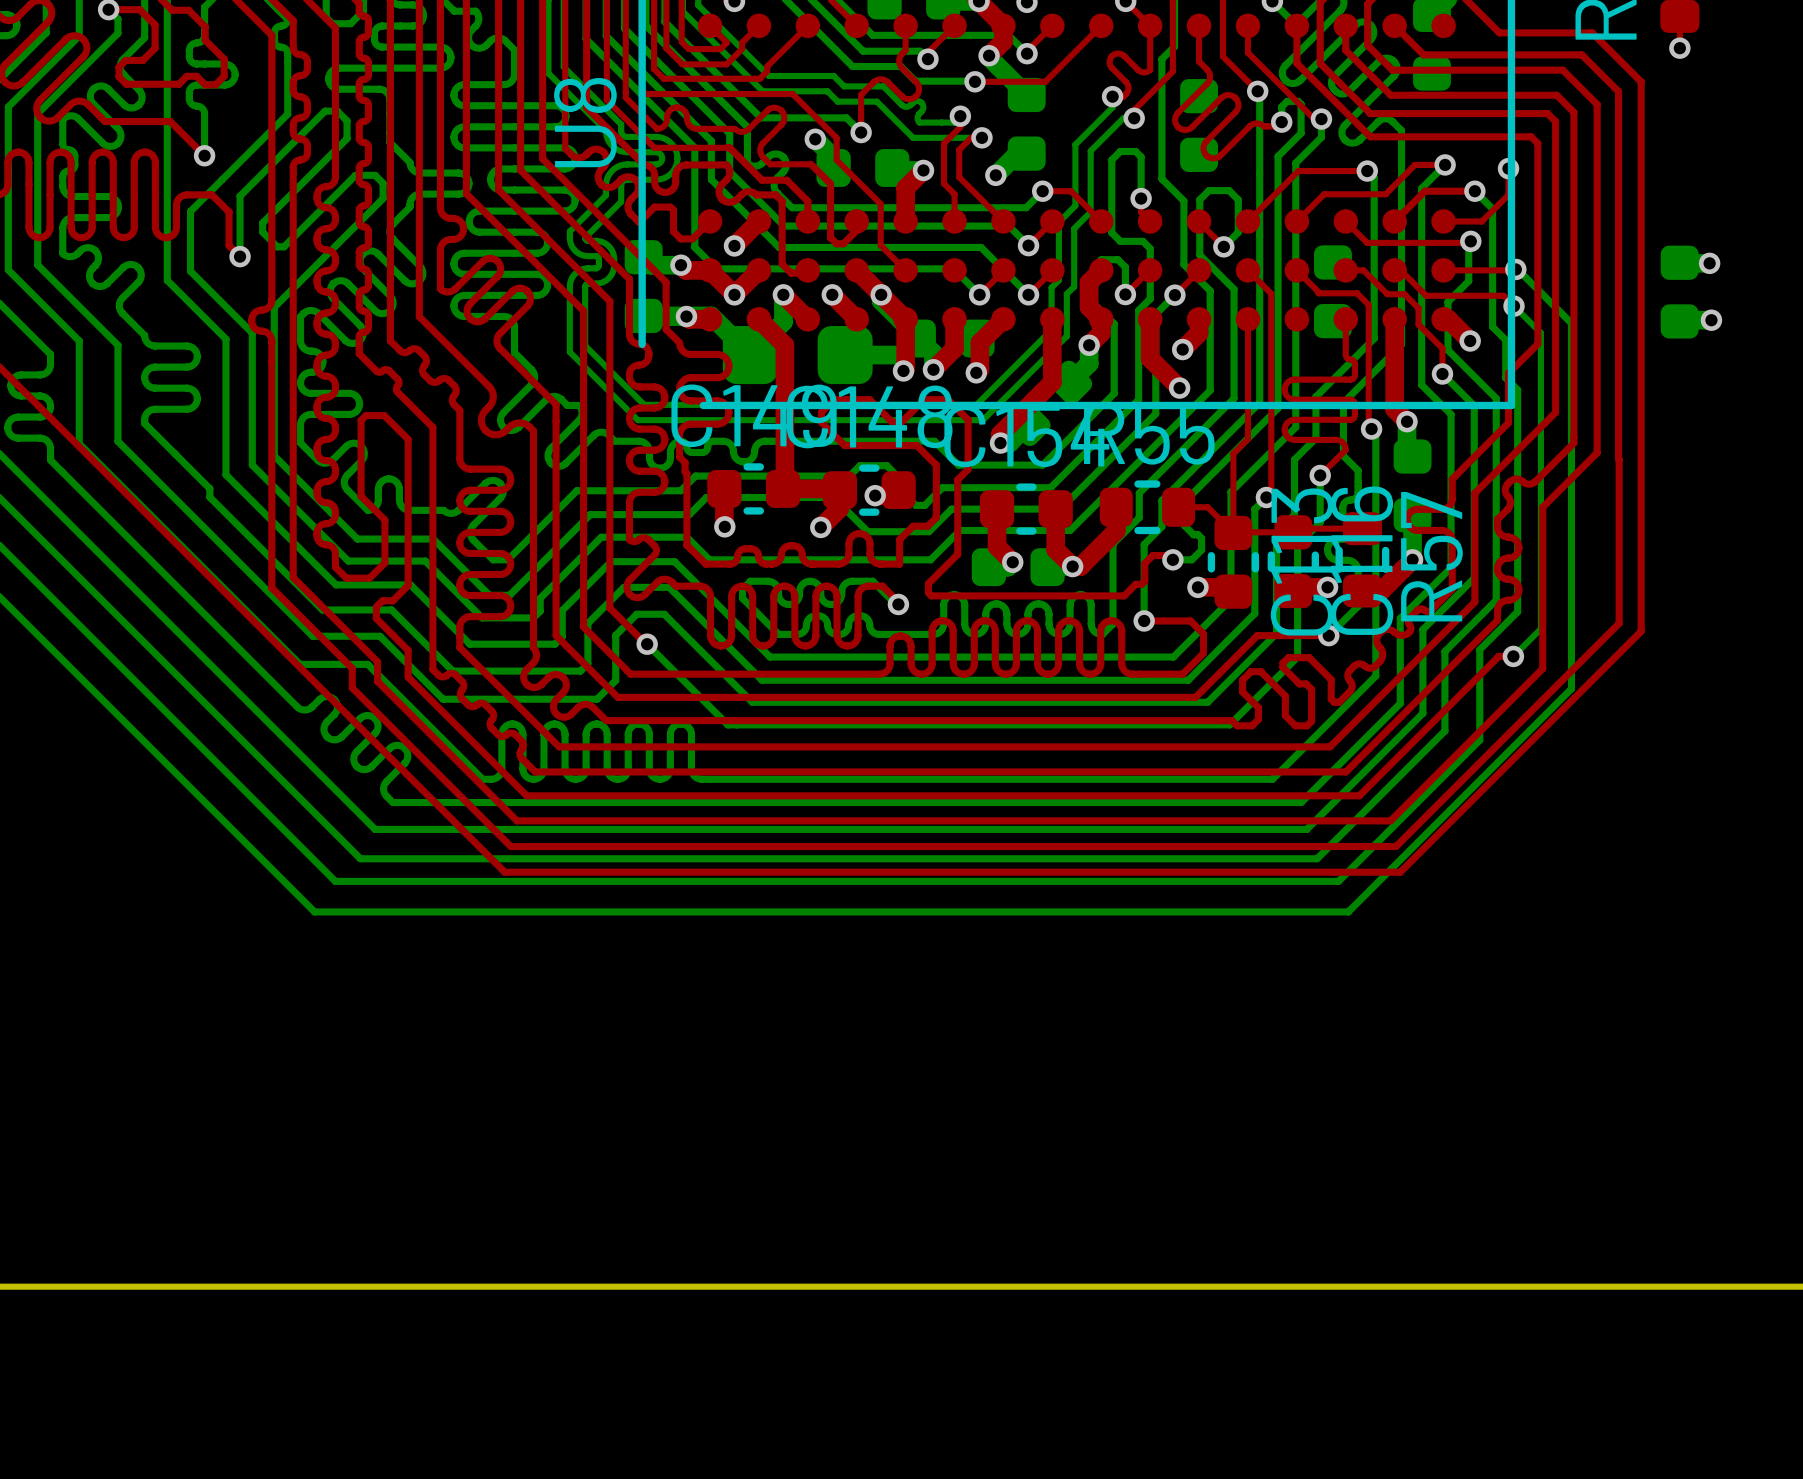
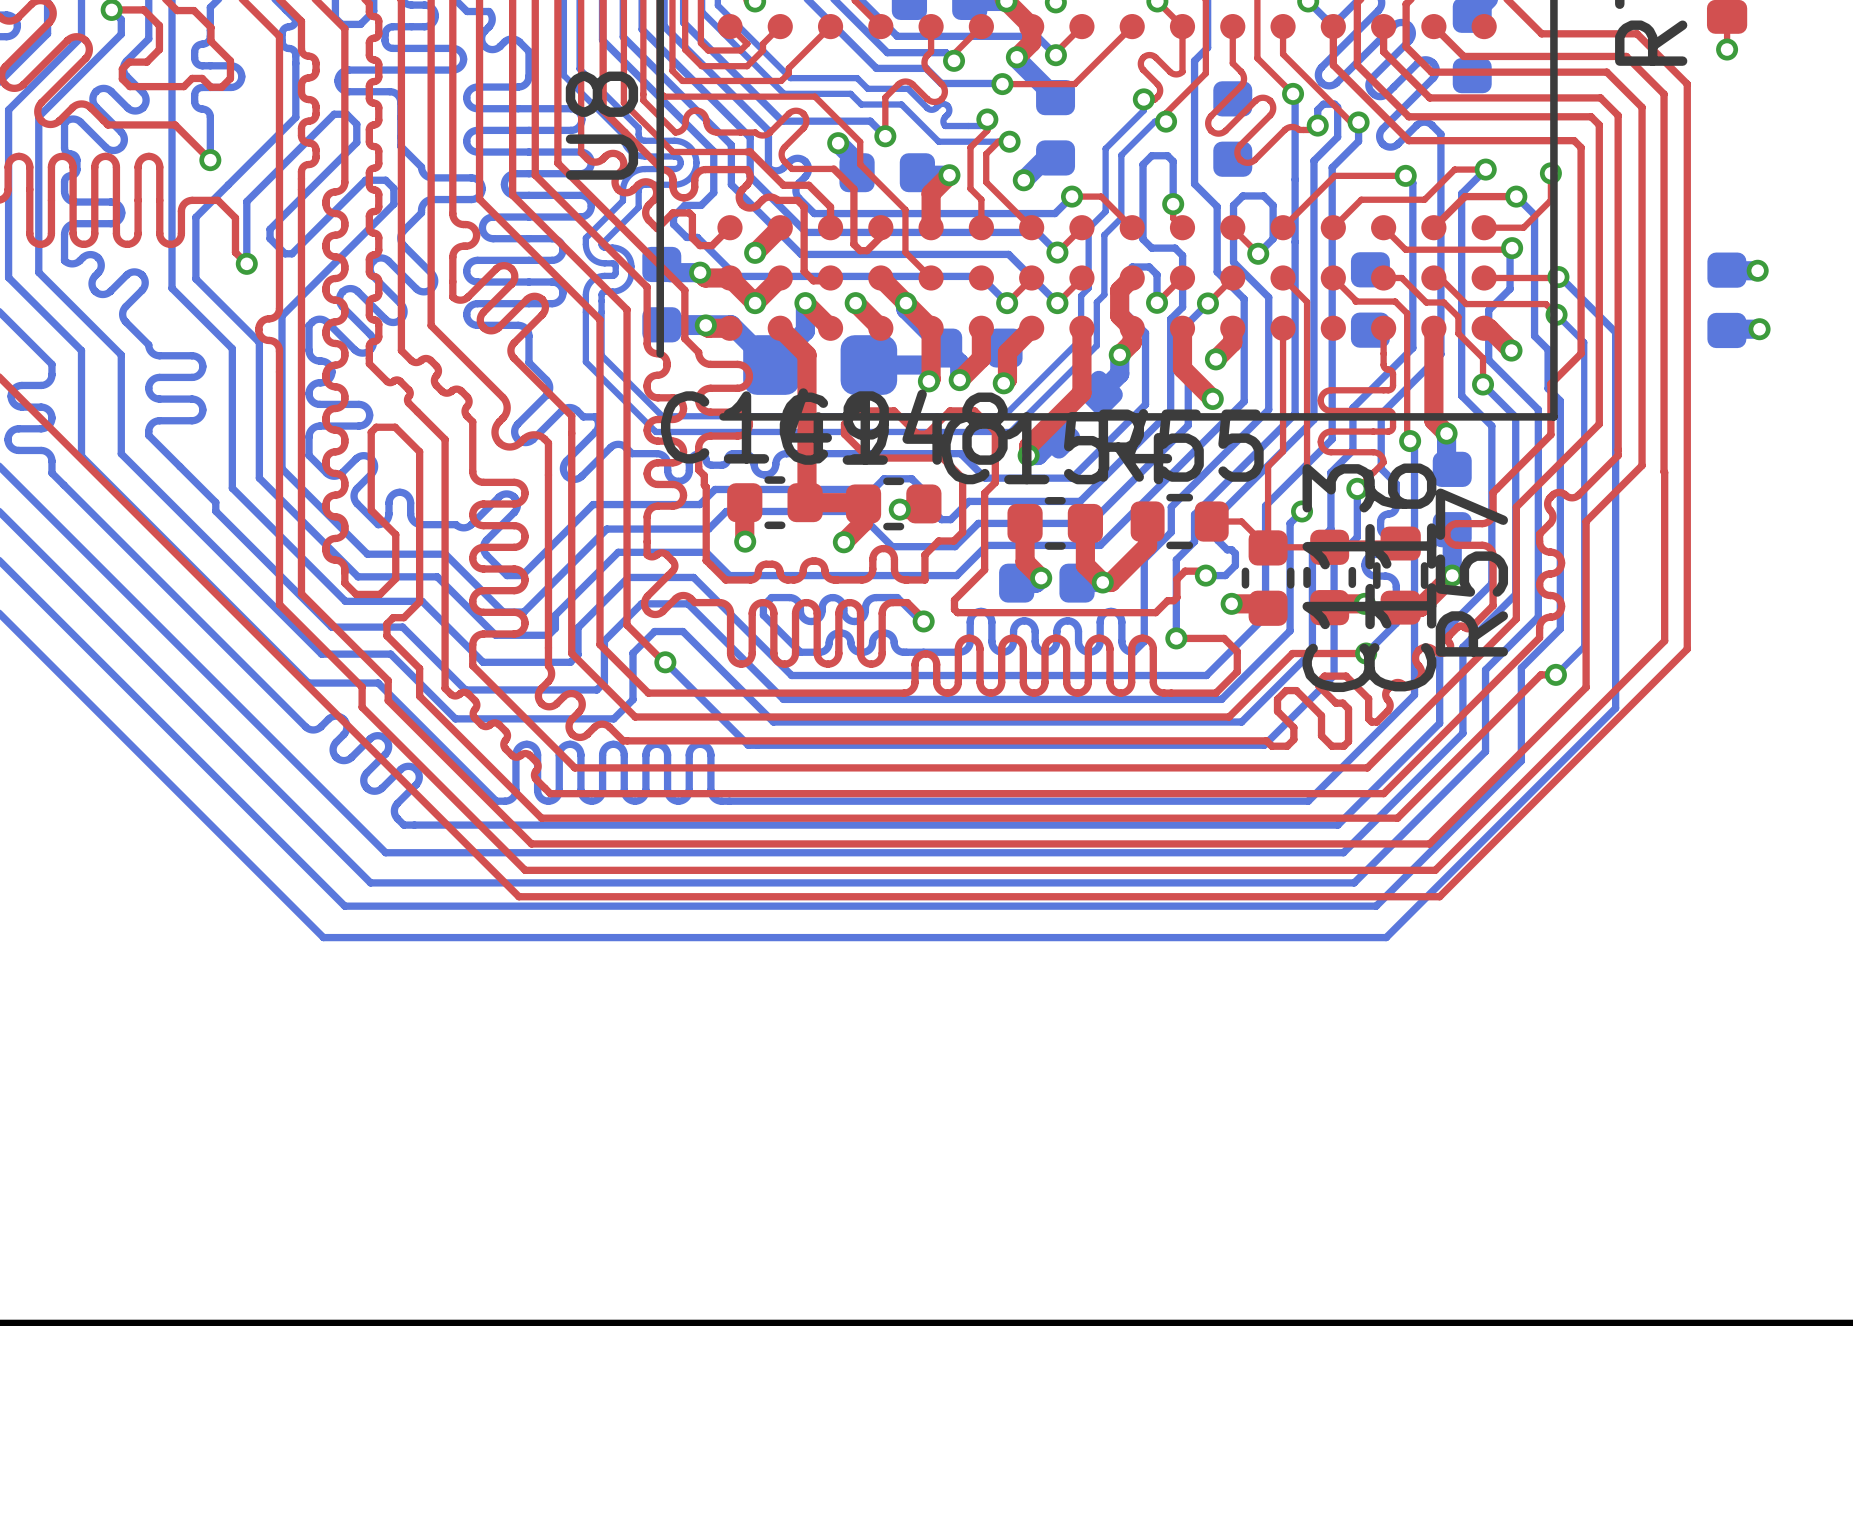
bottom track: (694, 147) (694, 247) -> (713, 151) (713, 192) (701, 205) (684, 205) (673, 216) (673, 224) (686, 237) (697, 237) (714, 254)

